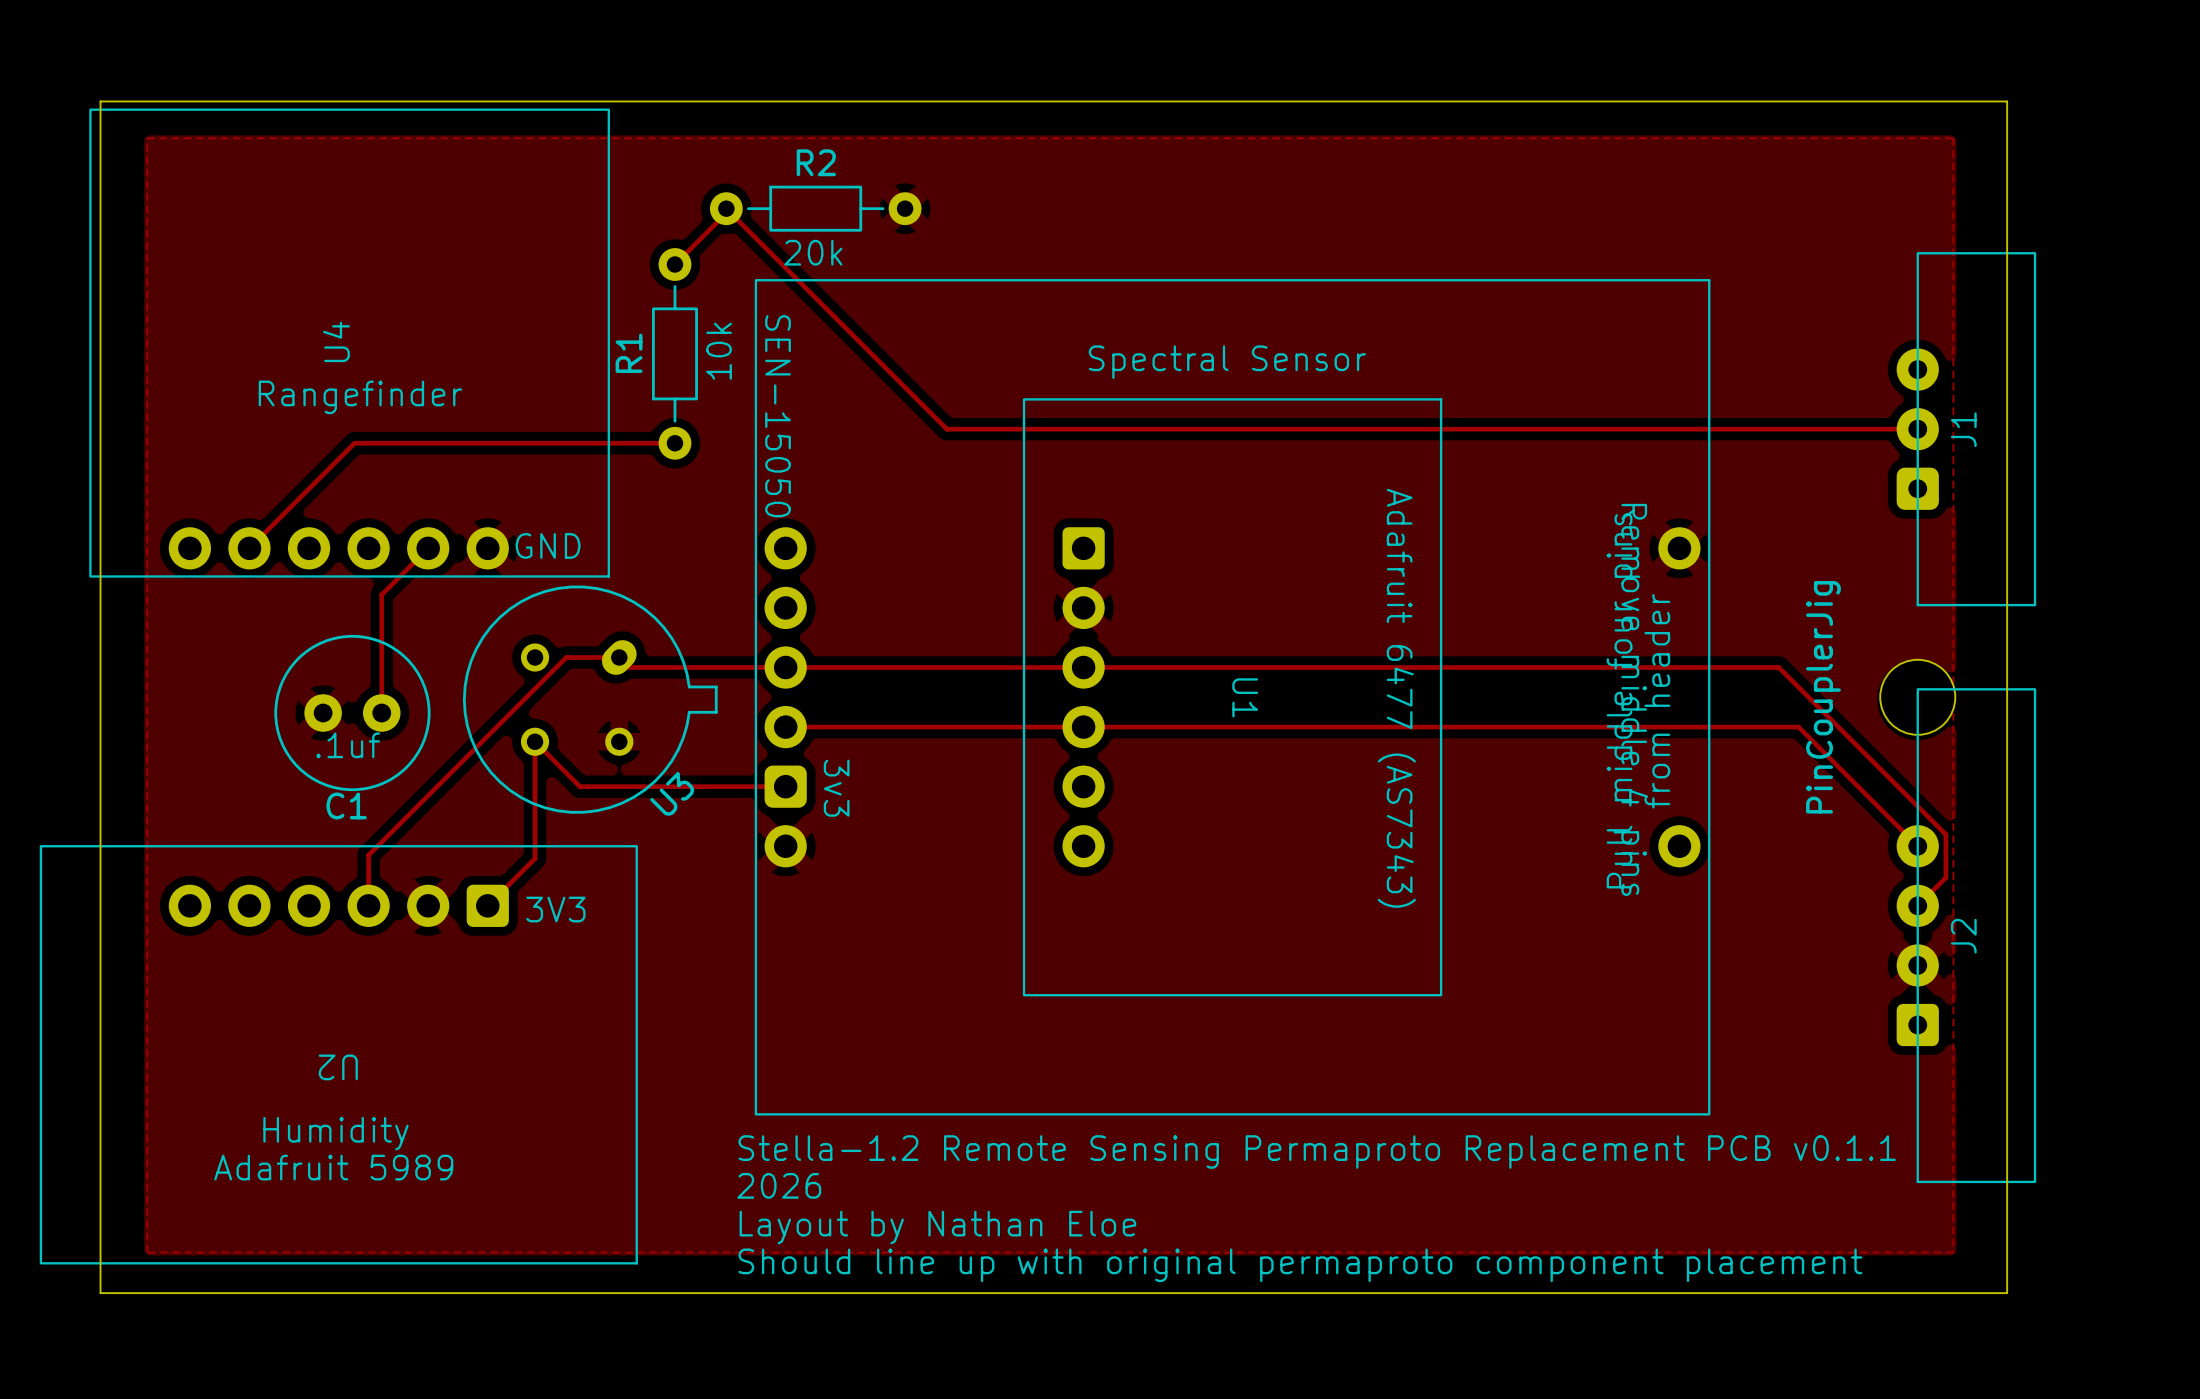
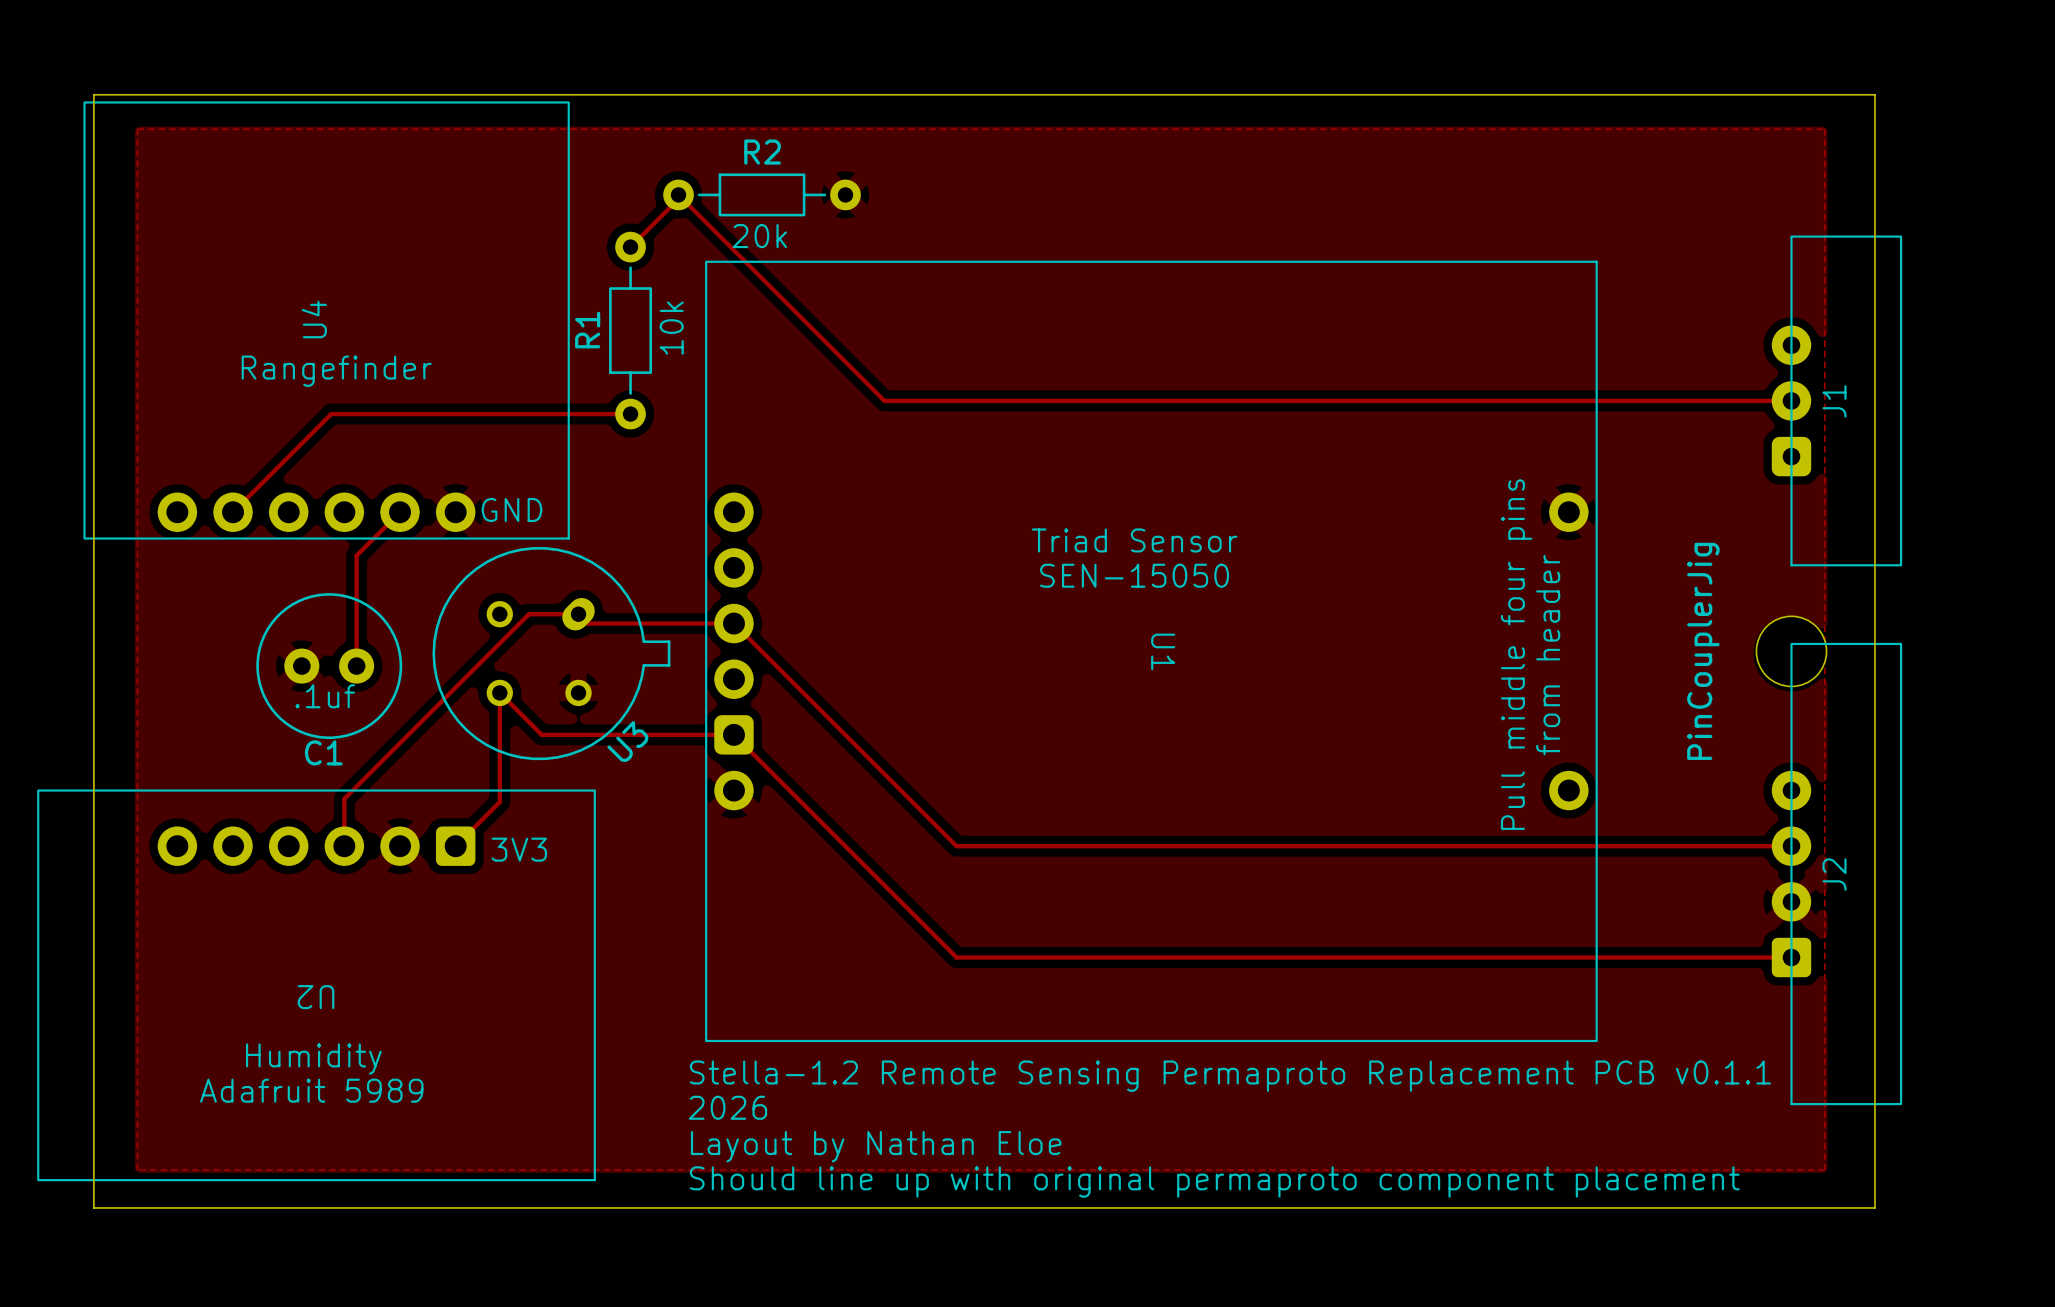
U1 footprint: [754, 279, 1711, 1116] -> [705, 260, 1598, 1043]
text: Spectral Sensor (1227, 362) -> none
text: none -> Triad Sensor (1134, 540)
text: none -> SEN-15050 (1134, 575)
track: (785, 667) (1778, 667) (1945, 834) (1945, 877) (1917, 905) -> (733, 623) (956, 846) (1791, 846)
track: (785, 727) (1798, 727) (1917, 846) -> none
track: none -> (733, 734) (956, 957) (1791, 957)

